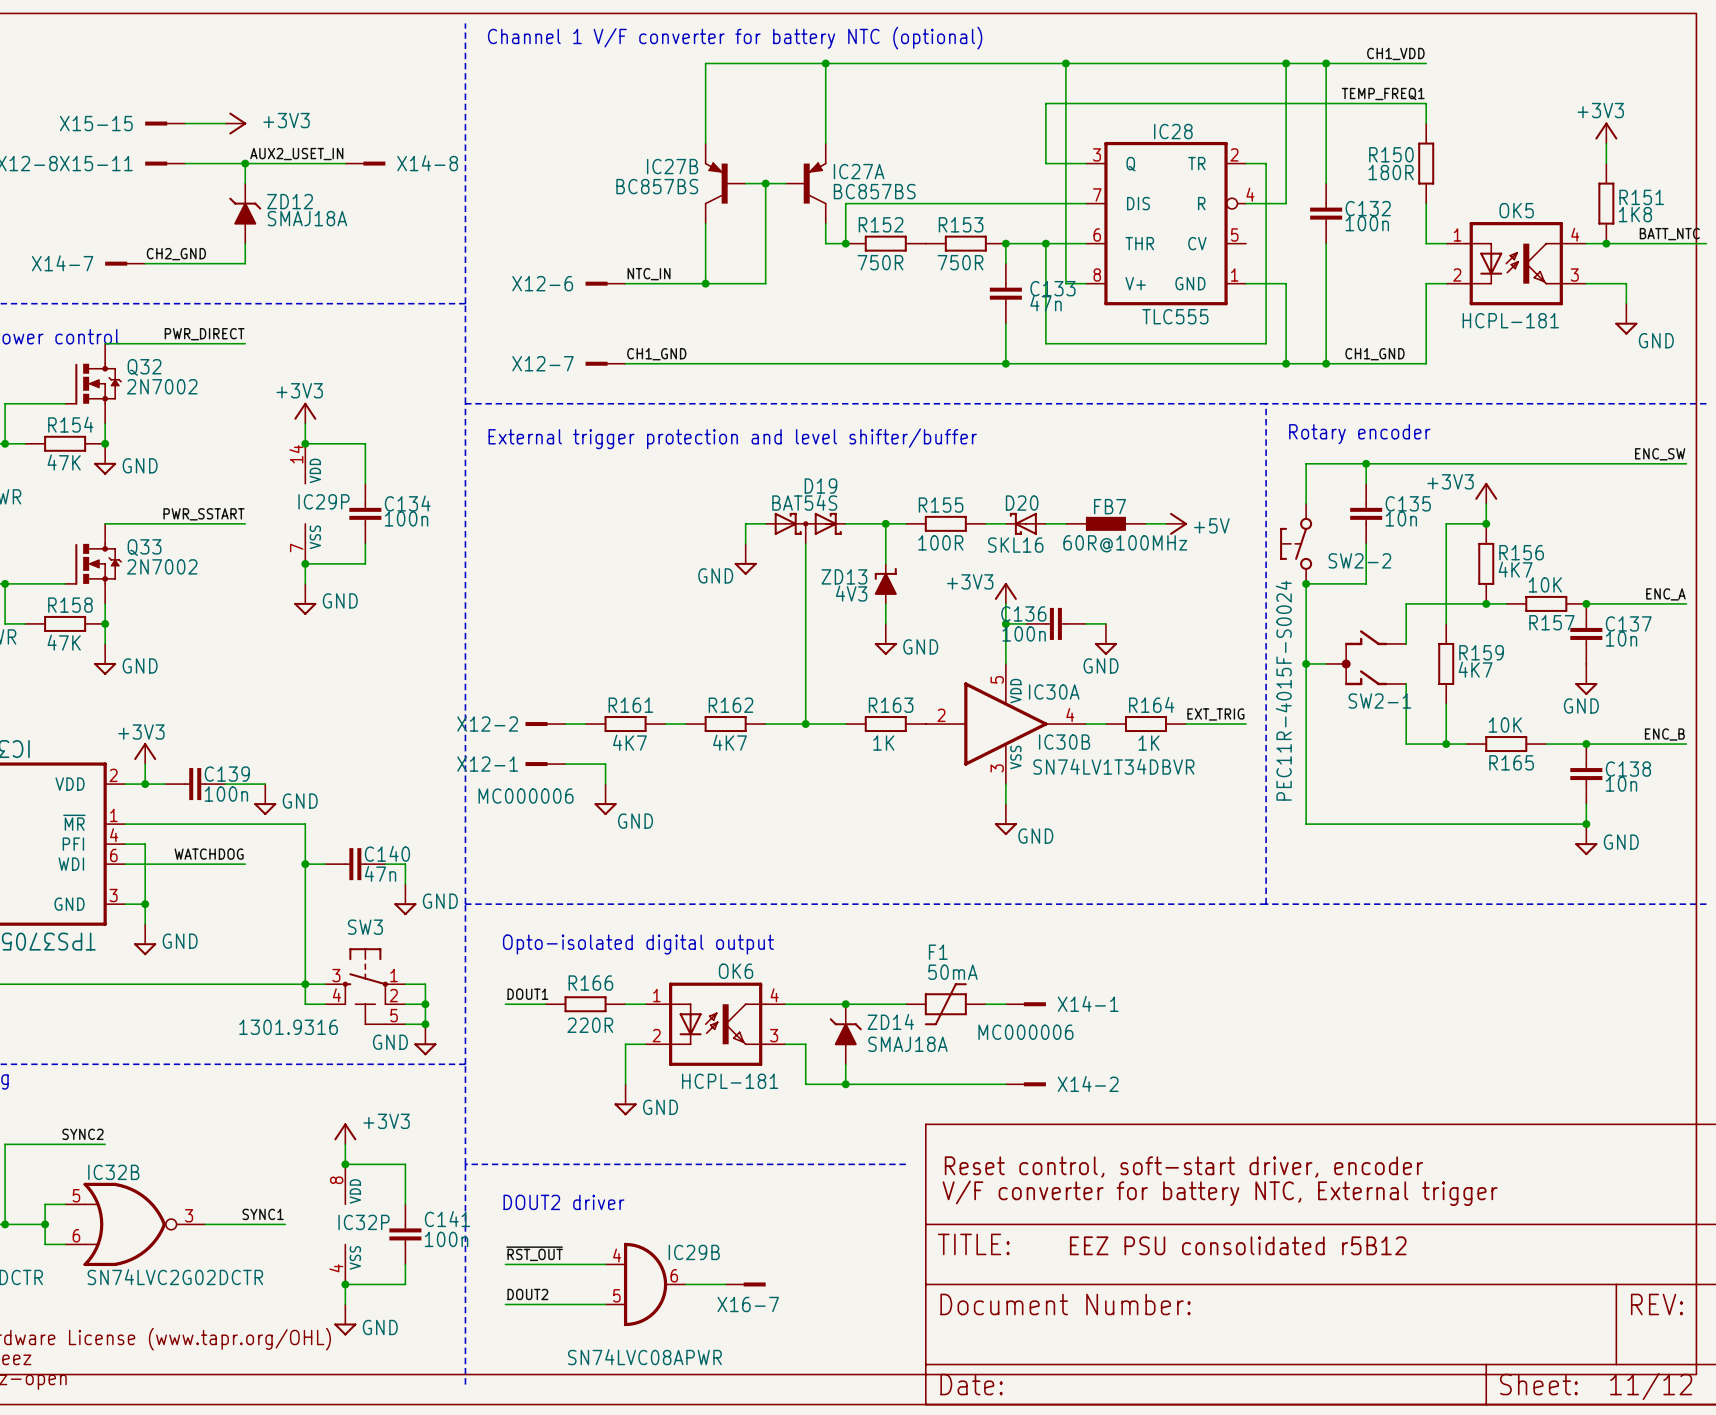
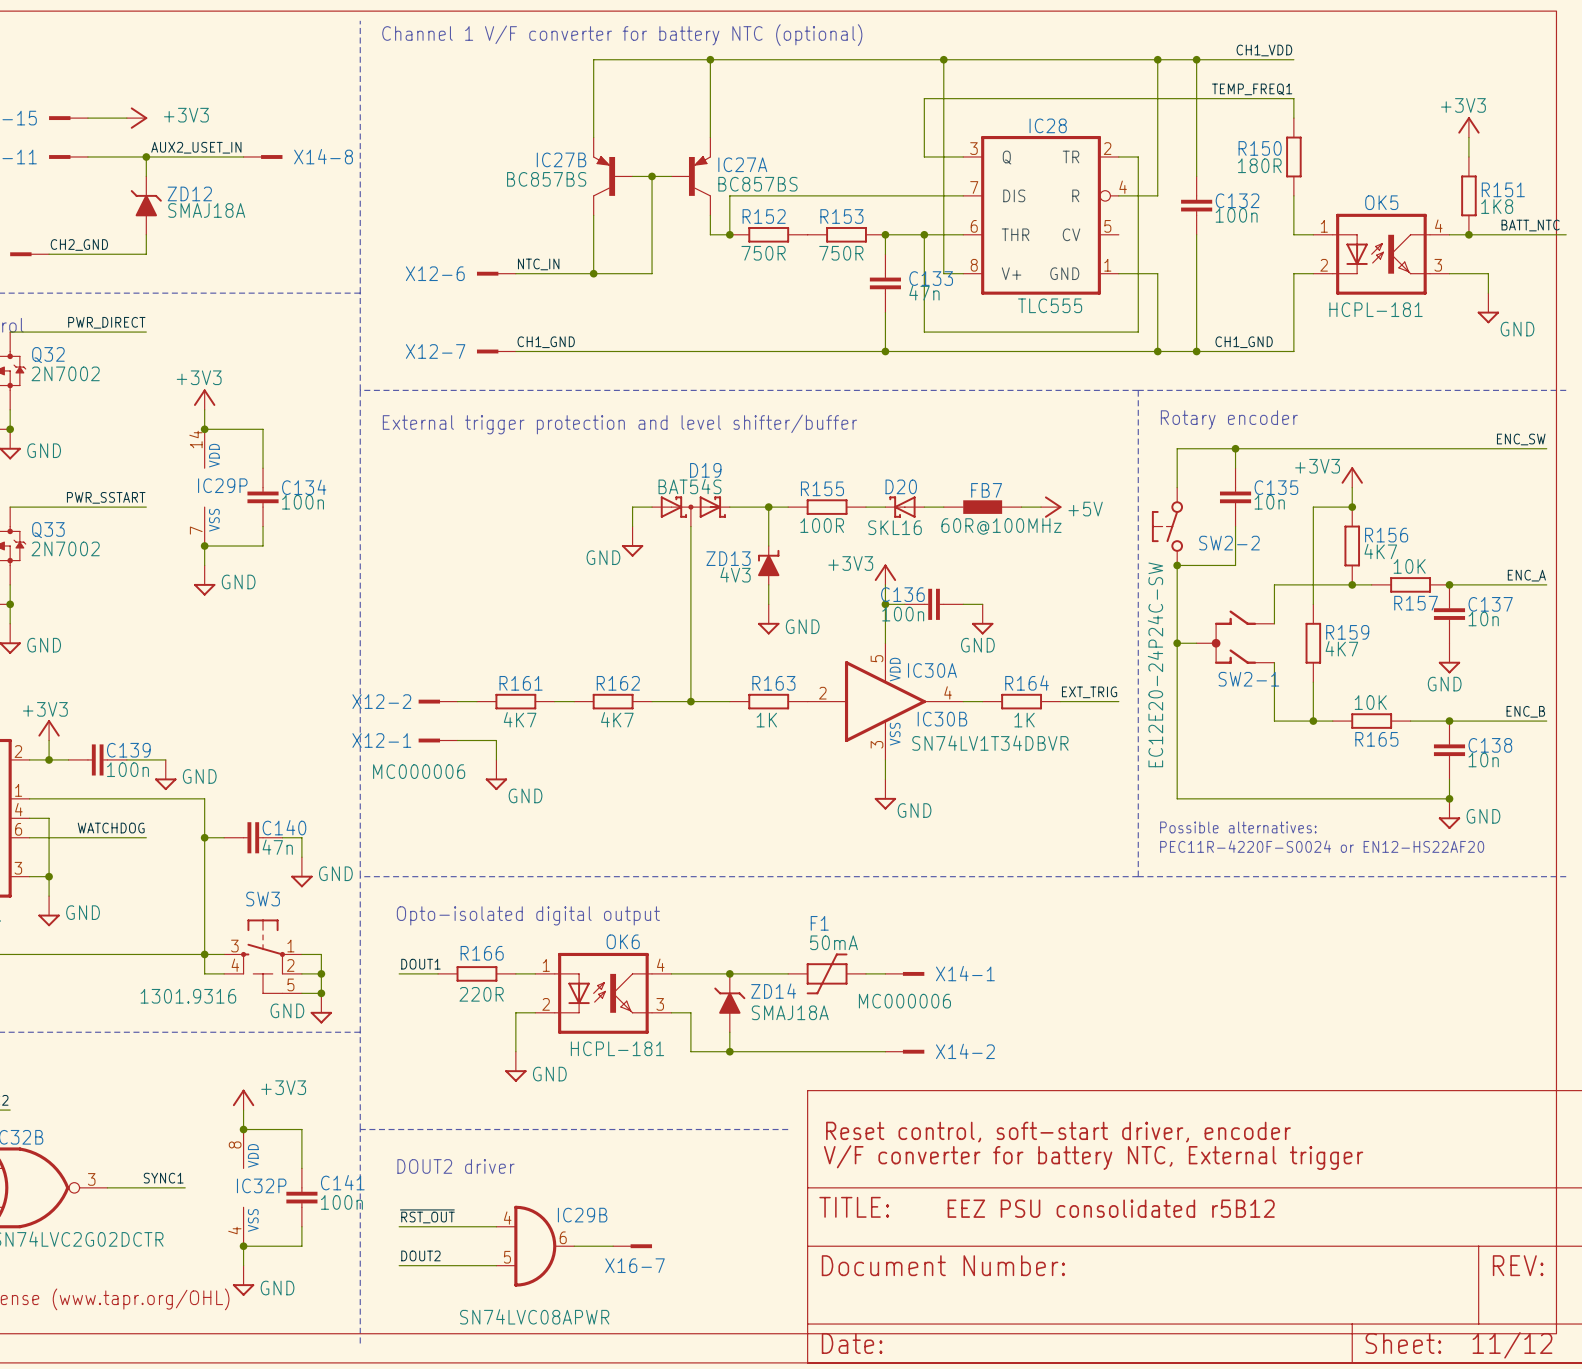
SW2-2 value: PEC11R-4015F-S0024 (1283, 690) -> EC12E20-24P24C-SW (1155, 664)
text: none -> Possible alternatives: (1238, 827)
text: none -> PEC11R-4220F-S0024 or EN12-HS22AF20 (1322, 846)

